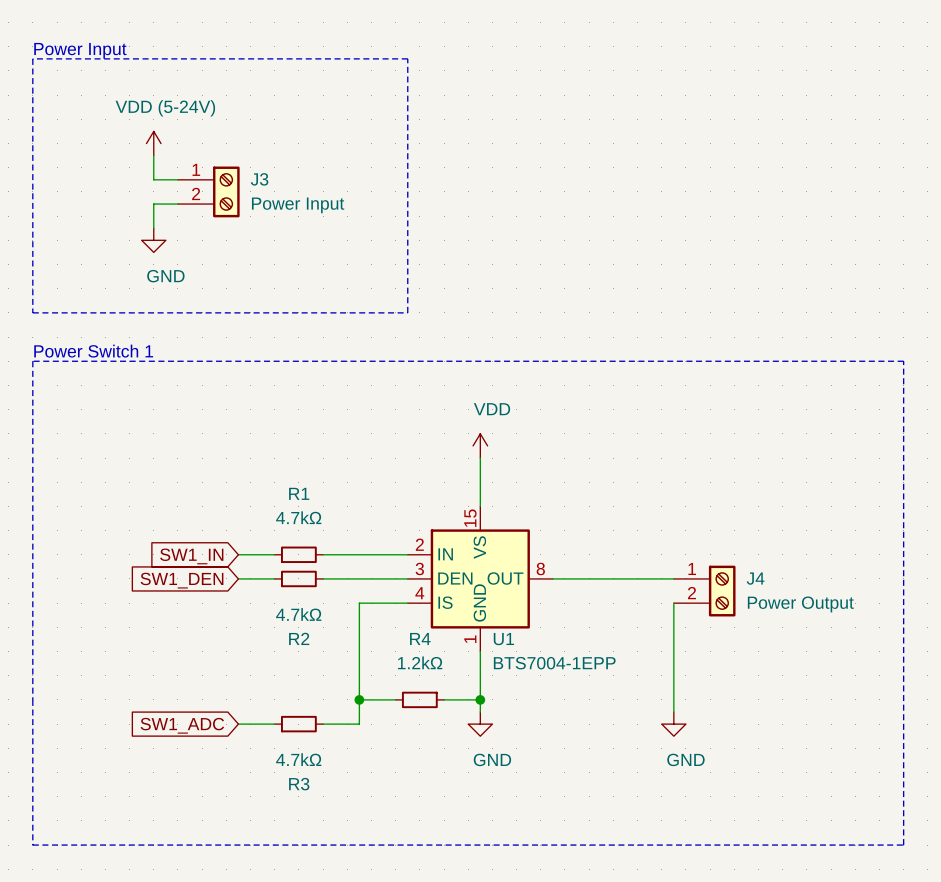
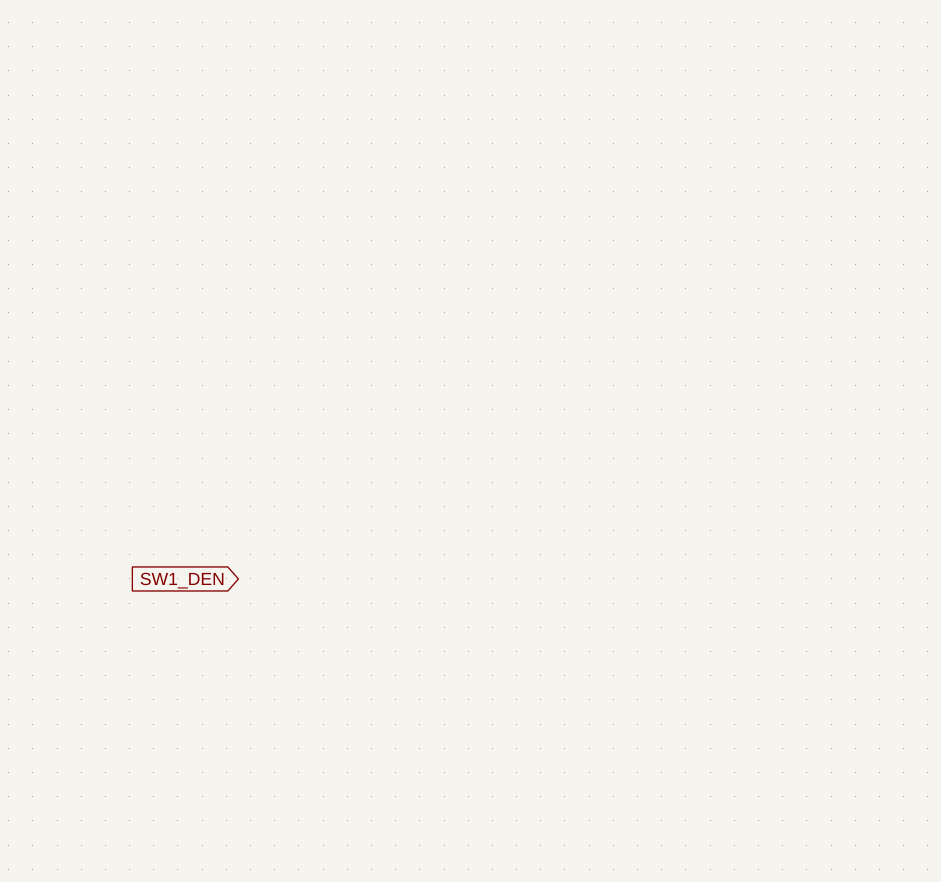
text: Power Input (80, 50) -> none
line: (32, 58) (32, 312) (407, 312) (407, 58) (32, 58) -> none
power symbol: VDD (5-24V) (153, 143) -> none
wire: (153, 155) (153, 179) (177, 179) -> none
J3: Power Input (208, 191) -> none
wire: (177, 204) (153, 204) (153, 228) -> none
power symbol: GND (153, 240) -> none
text: Power Switch 1 (93, 351) -> none
line: (32, 361) (32, 845) (903, 845) (903, 361) (32, 361) -> none
power symbol: VDD (480, 445) -> none
wire: (480, 458) (480, 506) -> none
wire: (238, 554) (274, 554) -> none
R1: 4.7kΩ (298, 554) -> none
wire: (323, 554) (407, 554) -> none
global label: SW1_IN (191, 556) -> none
wire: (238, 578) (274, 578) -> none
R2: 4.7kΩ (298, 578) -> none
wire: (323, 578) (407, 578) -> none
U1: BTS7004-1EPP (480, 578) -> none
wire: (552, 578) (673, 578) -> none
J4: Power Output (704, 591) -> none
wire: (407, 603) (359, 603) (359, 724) (323, 724) -> none
wire: (673, 603) (673, 712) -> none
wire: (480, 651) (480, 712) -> none
wire: (359, 699) (395, 699) -> none
junction: (359, 699) -> none
R4: 1.2kΩ (419, 699) -> none
wire: (444, 699) (480, 699) -> none
junction: (480, 699) -> none
wire: (238, 724) (274, 724) -> none
R3: 4.7kΩ (298, 724) -> none
power symbol: GND (480, 724) -> none
power symbol: GND (673, 724) -> none
global label: SW1_ADC (182, 725) -> none

